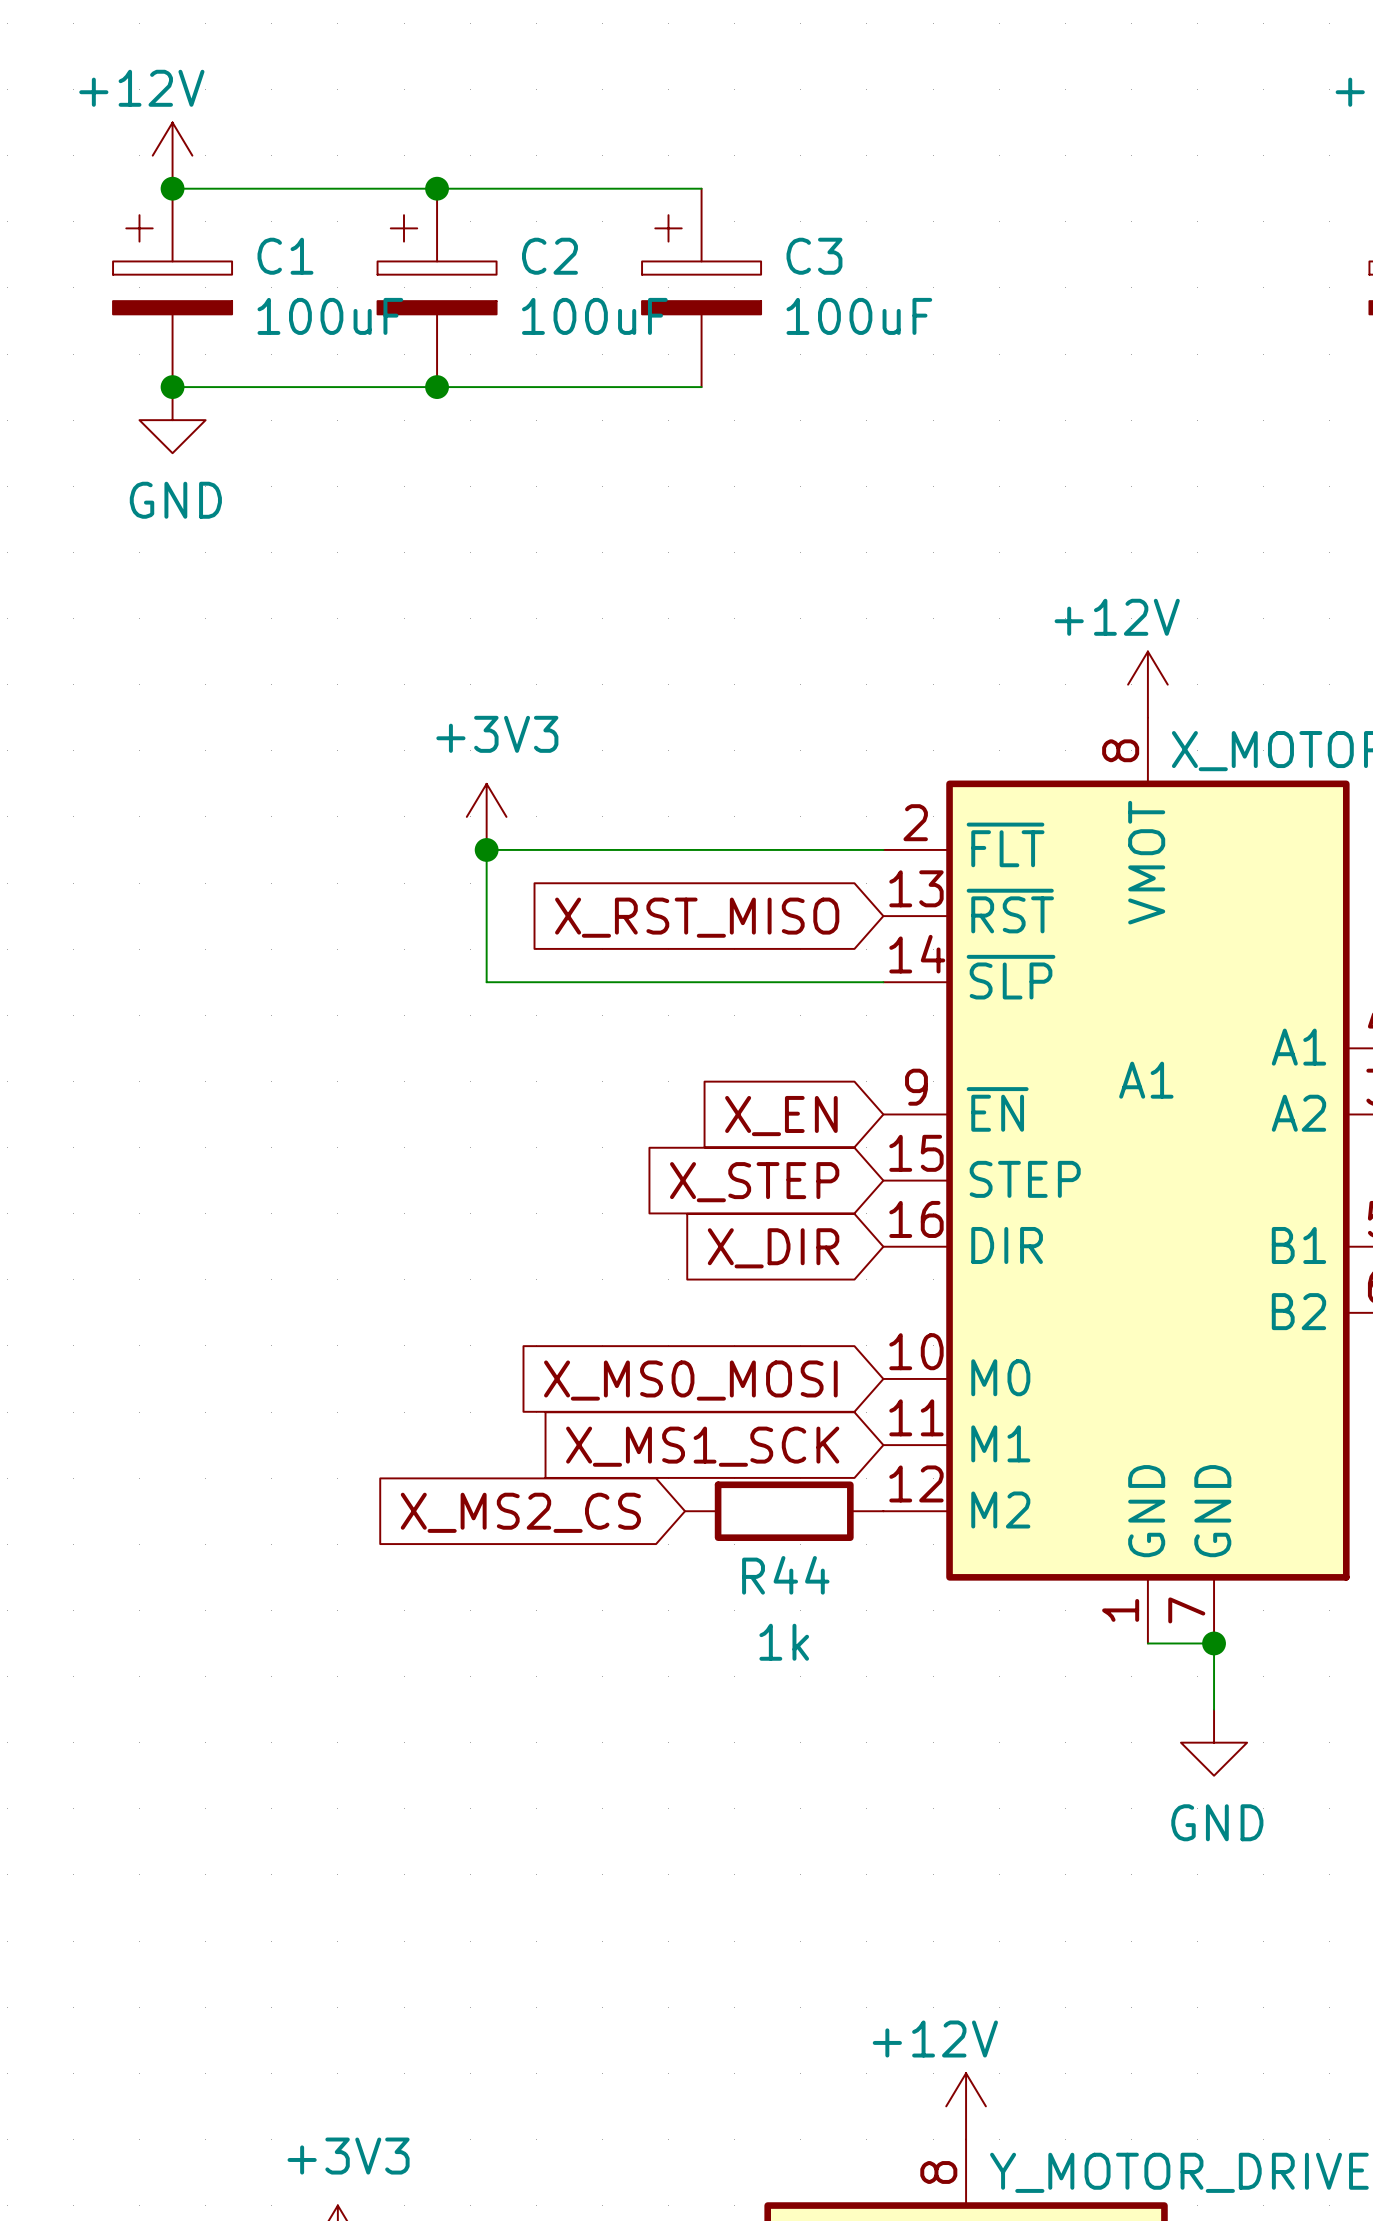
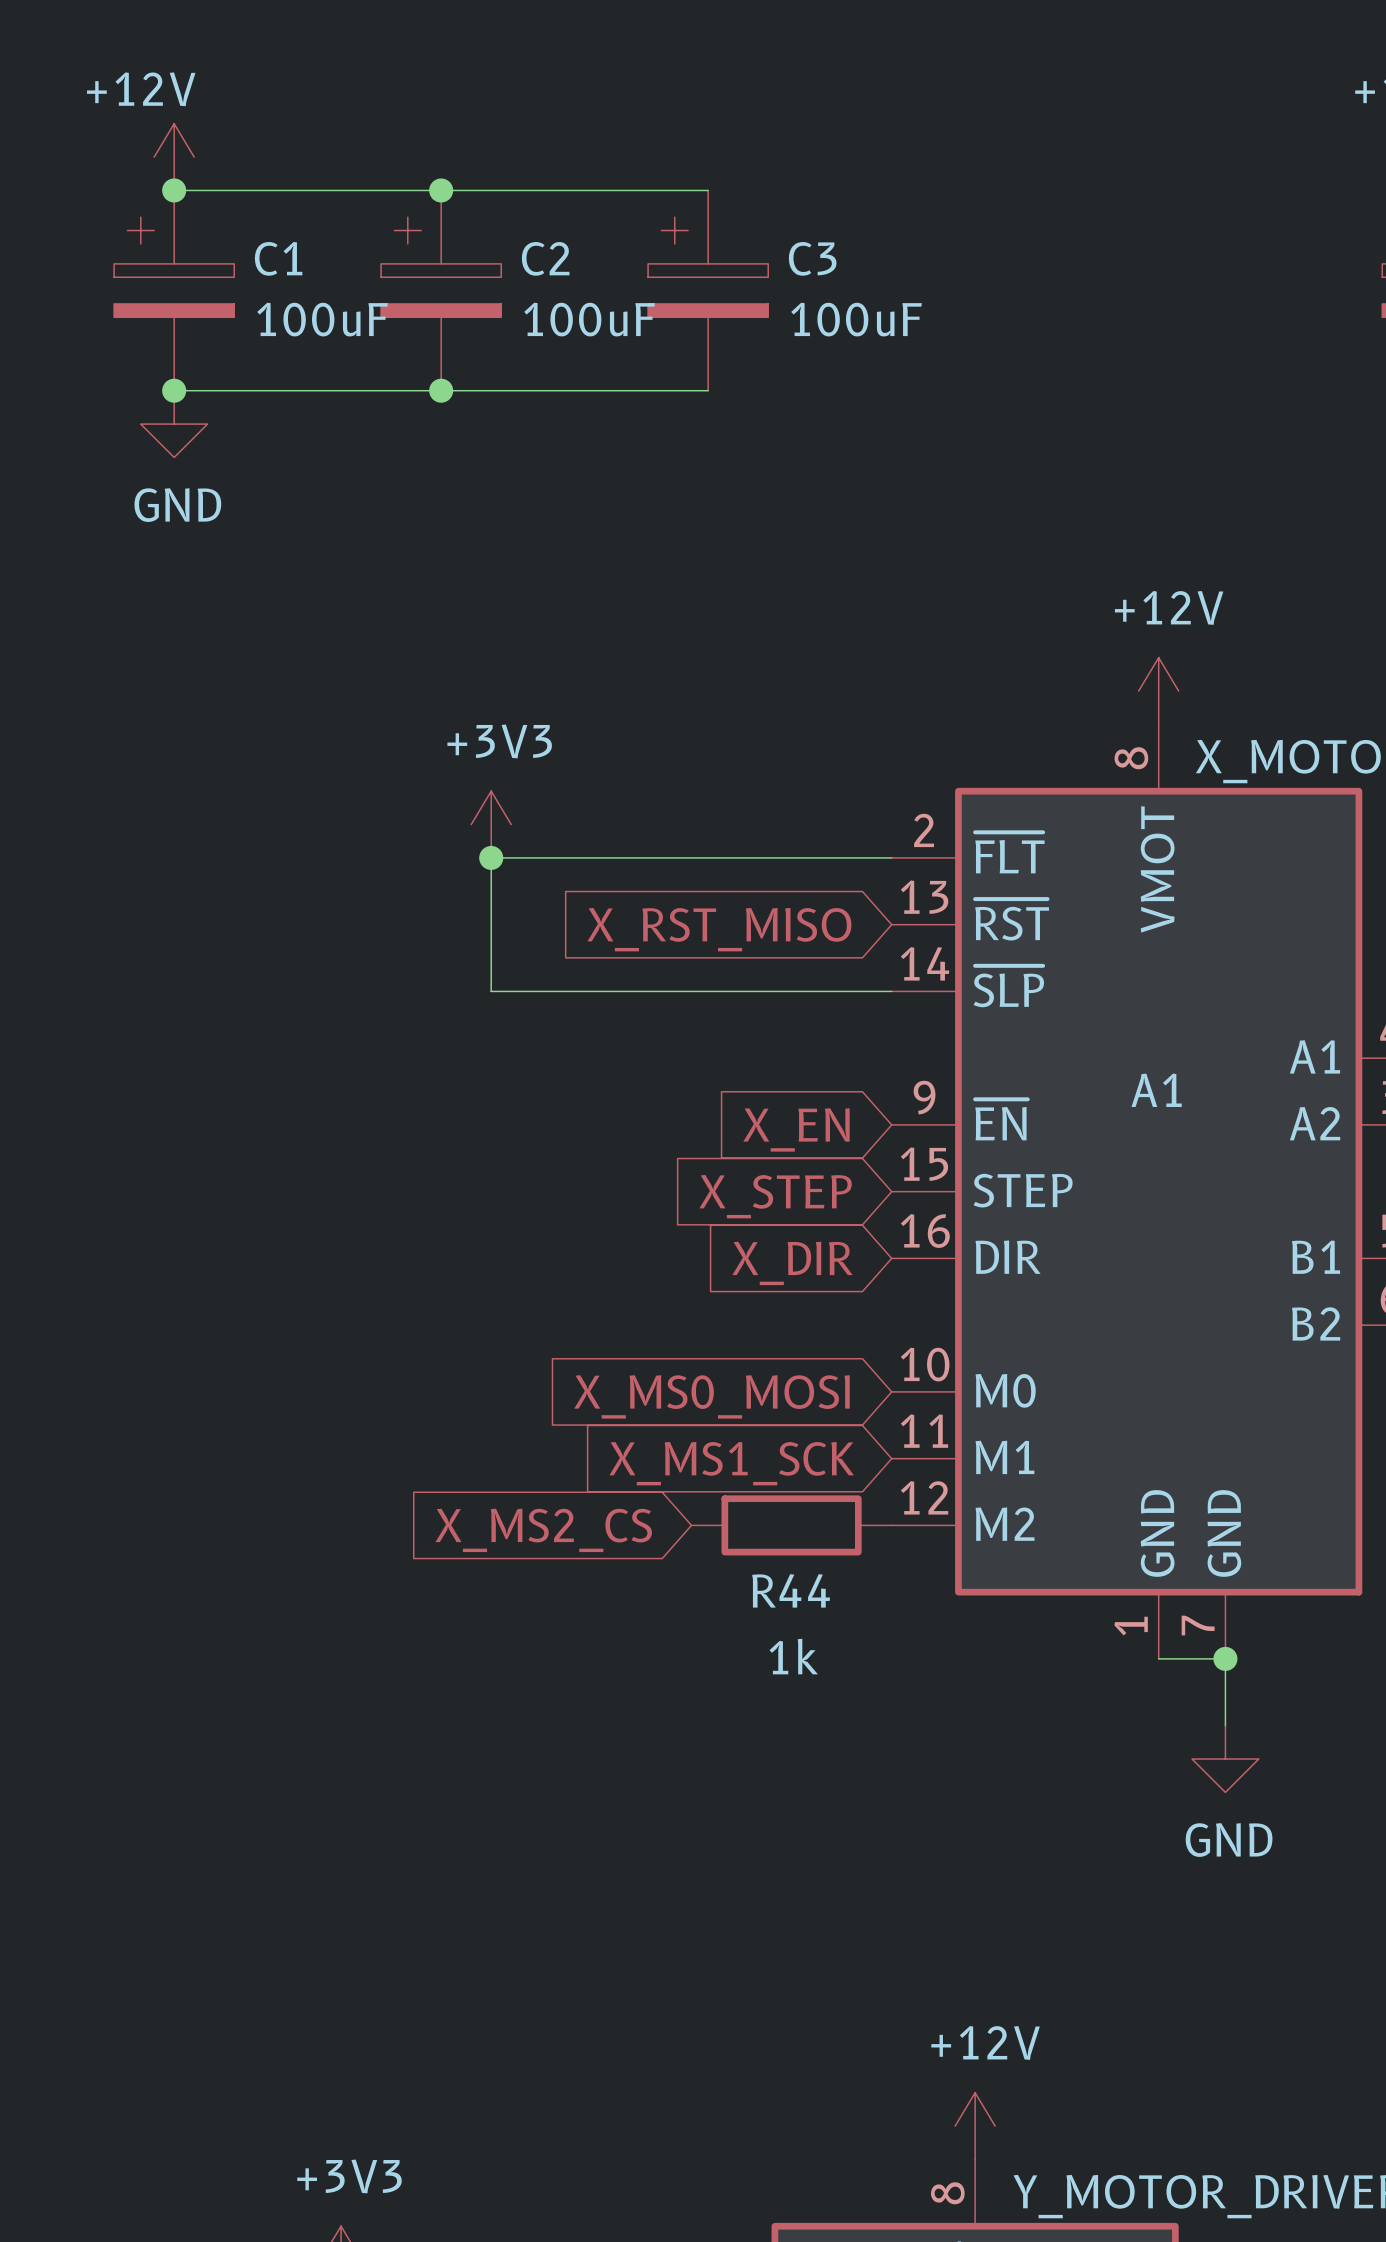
power symbol text position: +12V (1117, 617) -> +12V (1169, 607)
power symbol text position: +12V (935, 2039) -> +12V (985, 2042)

